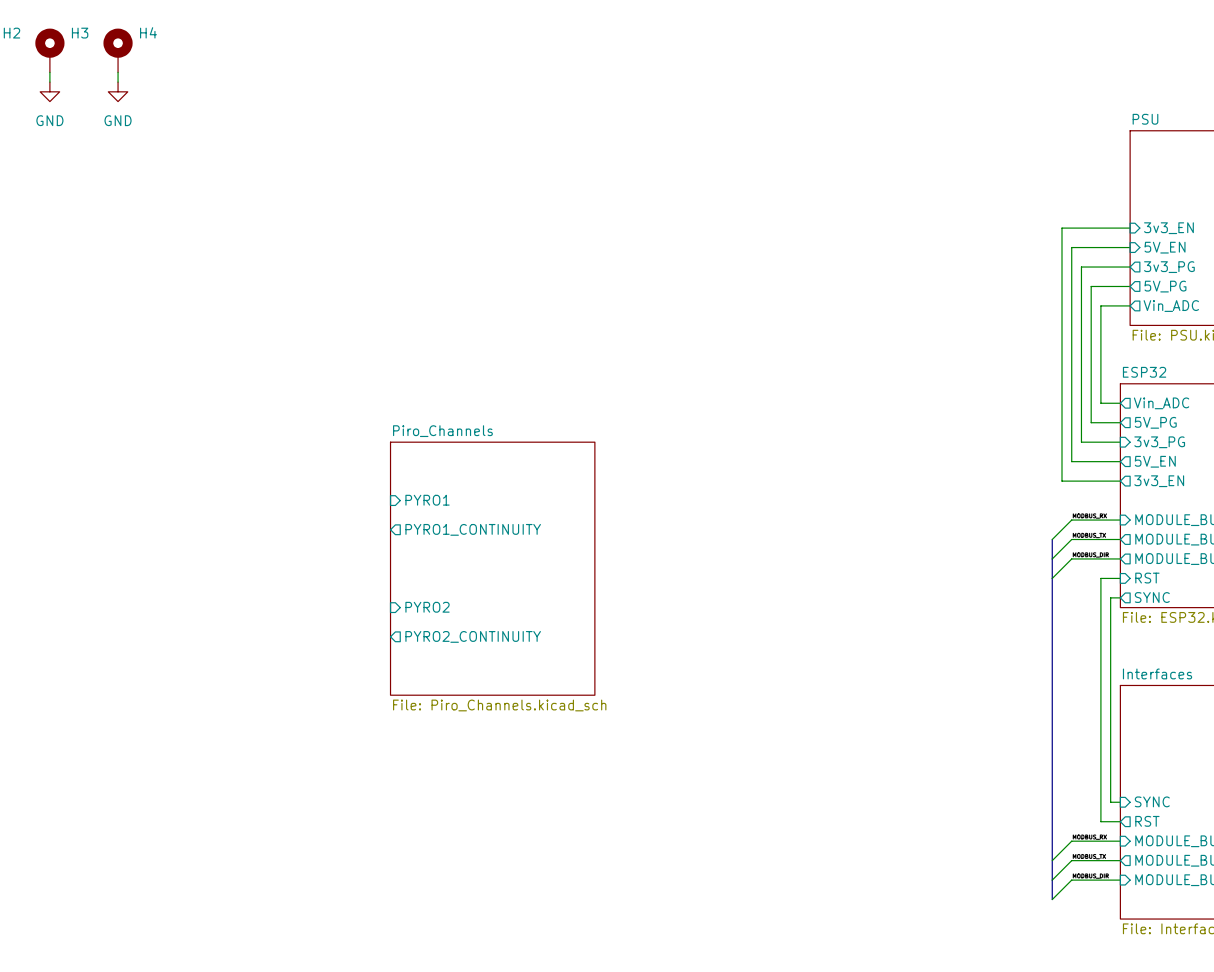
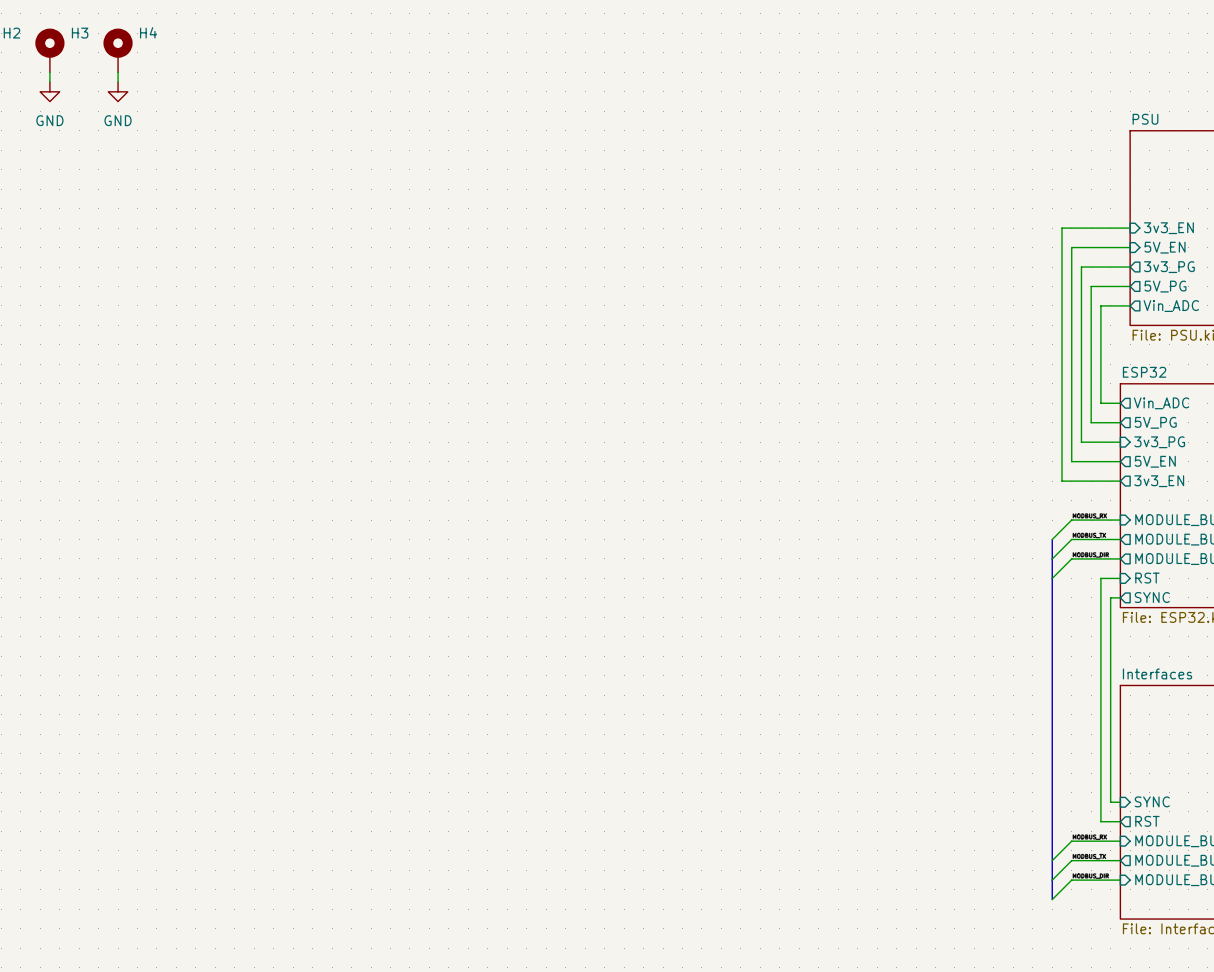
sheet pin: PYRO1 (427, 500) -> none
sheet pin: PYRO1_CONTINUITY (473, 529) -> none
sheet Piro_Channels: File: Piro_Channels.kicad_sch (492, 568) -> none
sheet pin: PYRO2 (427, 607) -> none
sheet pin: PYRO2_CONTINUITY (473, 636) -> none

